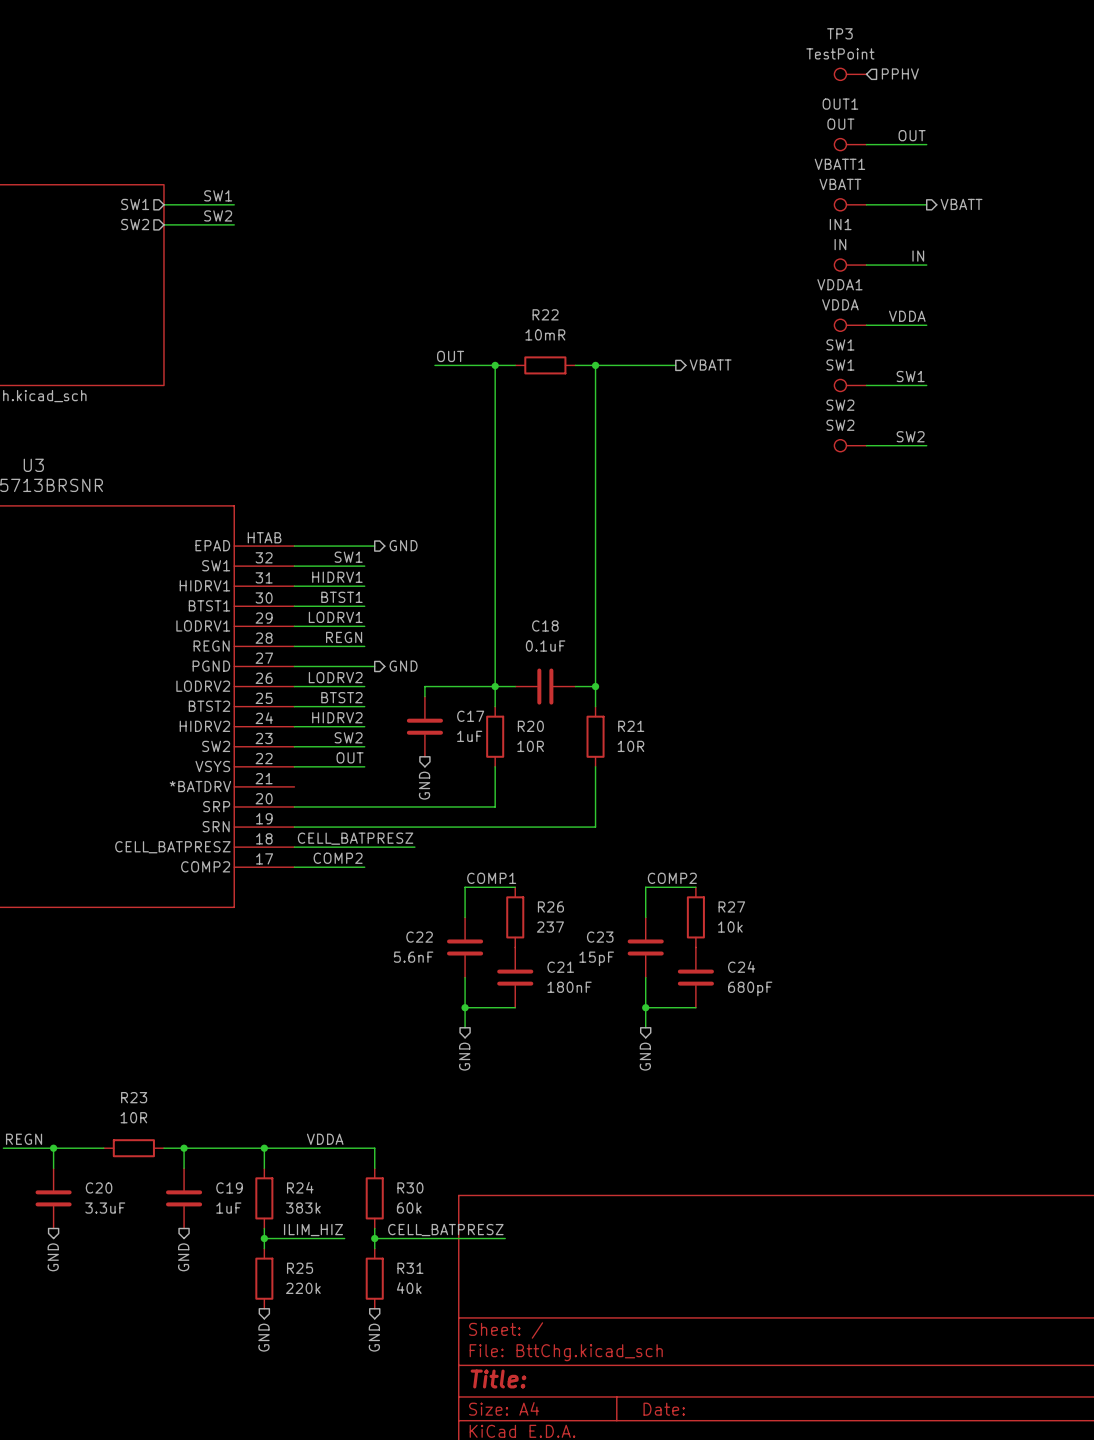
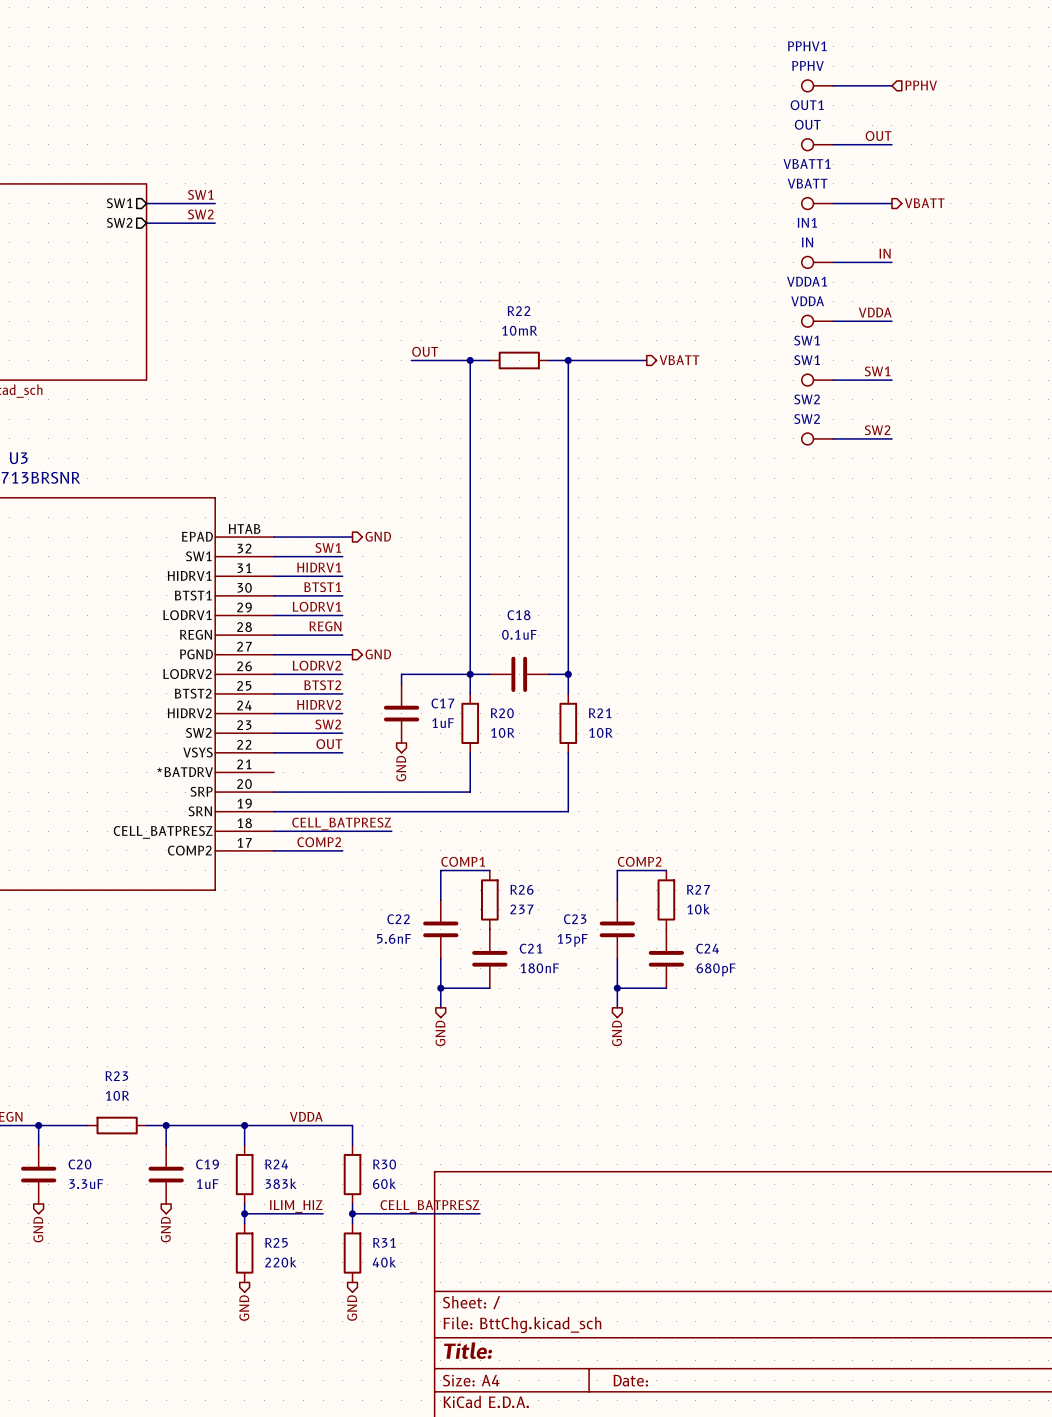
hierarchical label position: PPHV (900, 73) -> PPHV (921, 85)
TP3: TestPoint (850, 74) -> none
PPHV1: none -> PPHV (817, 85)
wire: none -> (833, 85) (891, 85)

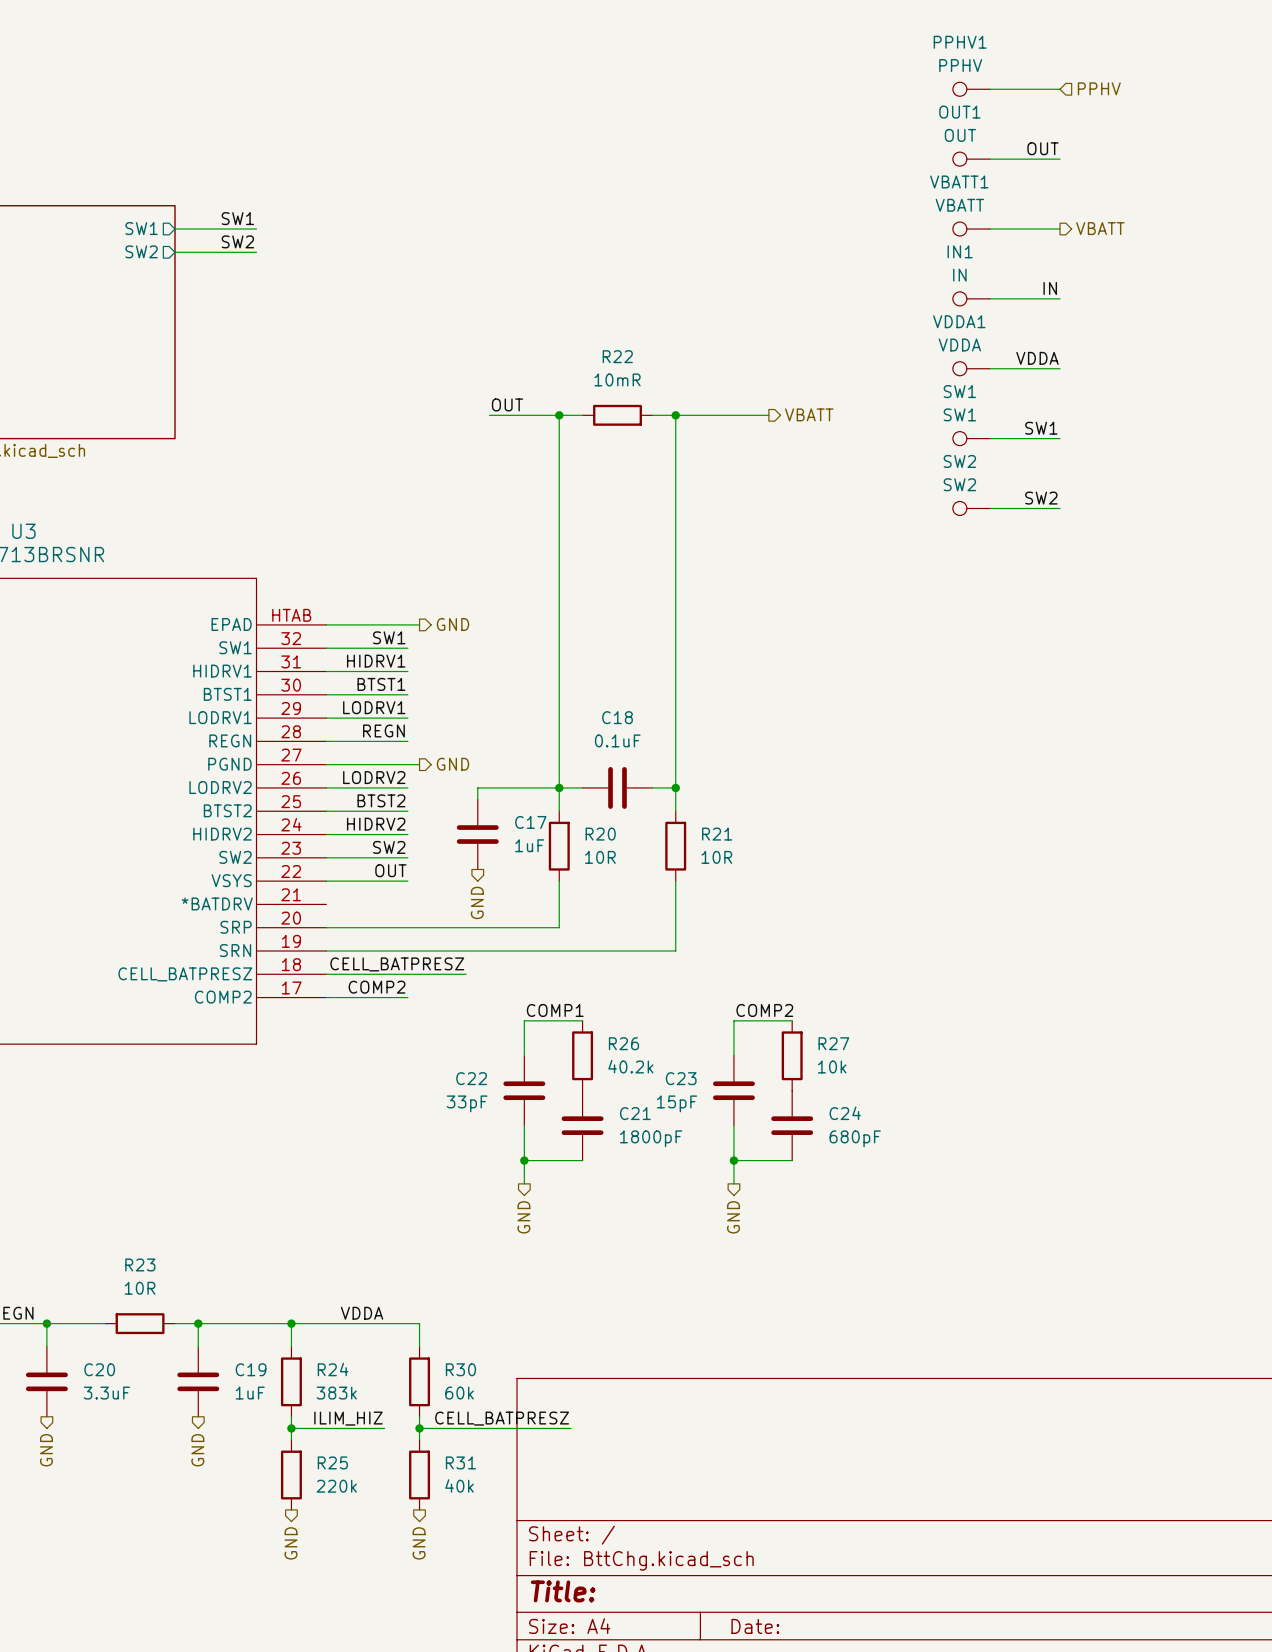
R26 value: 237 (521, 909) -> 40.2k (630, 1066)
C22 value: 5.6nF (394, 938) -> 33pF (467, 1103)
C21 value: 180nF (539, 968) -> 1800pF (651, 1138)

